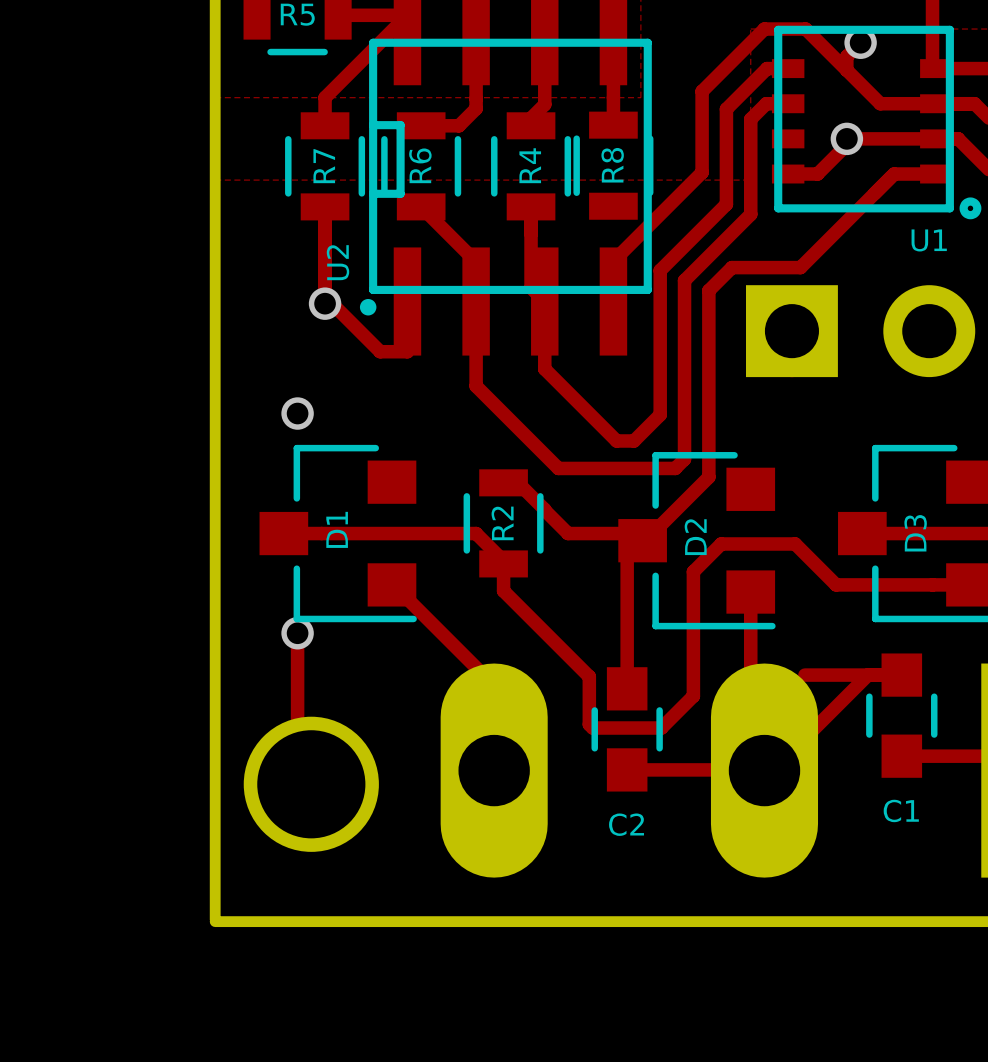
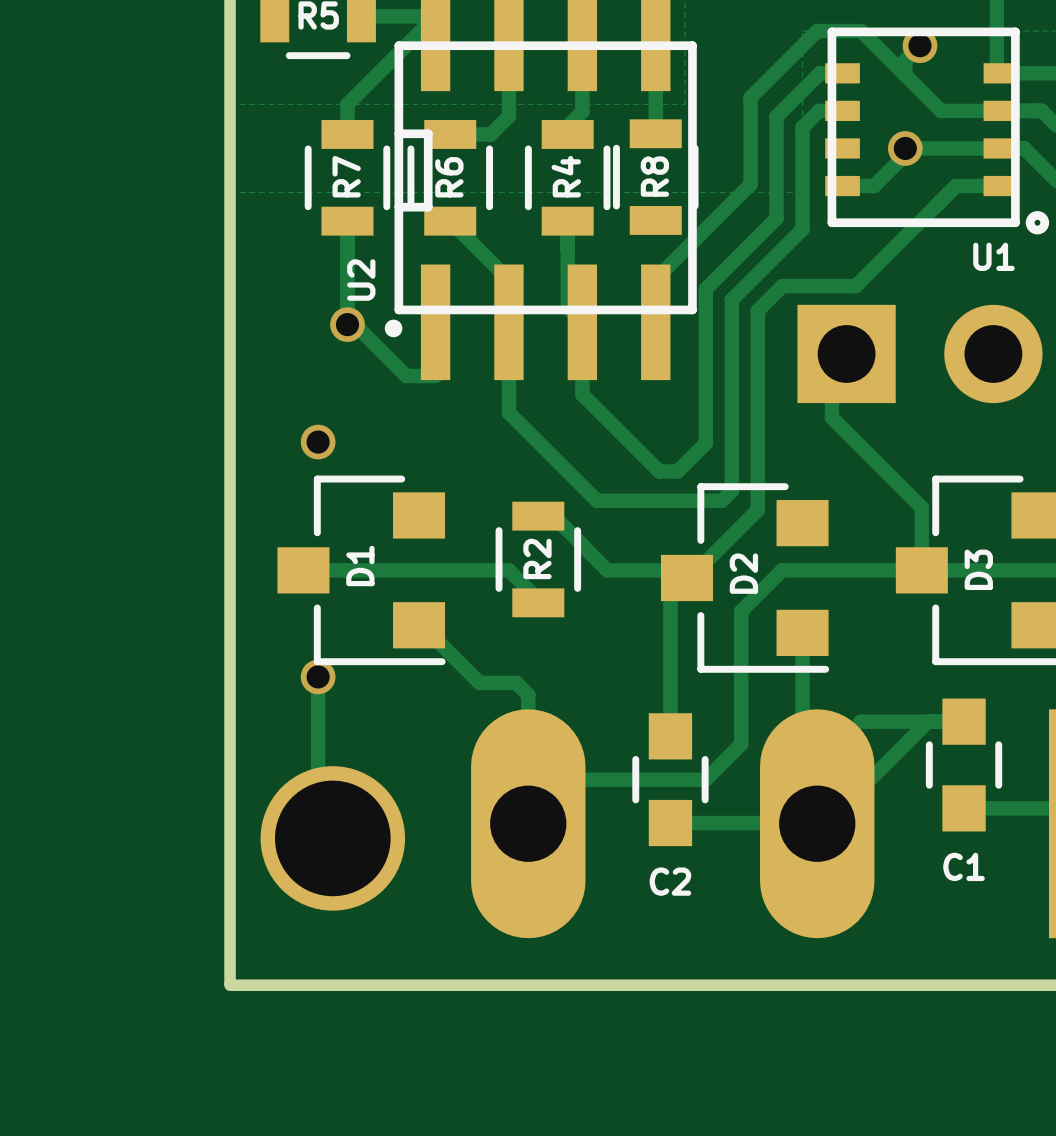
track: (721, 543) (795, 543) (836, 584) (970, 584) -> (771, 581) (782, 570) (921, 570) (921, 507) (831, 417) (831, 353)
track: (503, 563) (503, 590) (589, 676) (589, 724) (592, 728) (661, 728) -> (572, 779) (707, 778)
track: (393, 584) (507, 698) (494, 711) -> (420, 625) (479, 682) (516, 682) (528, 694) (528, 760)

